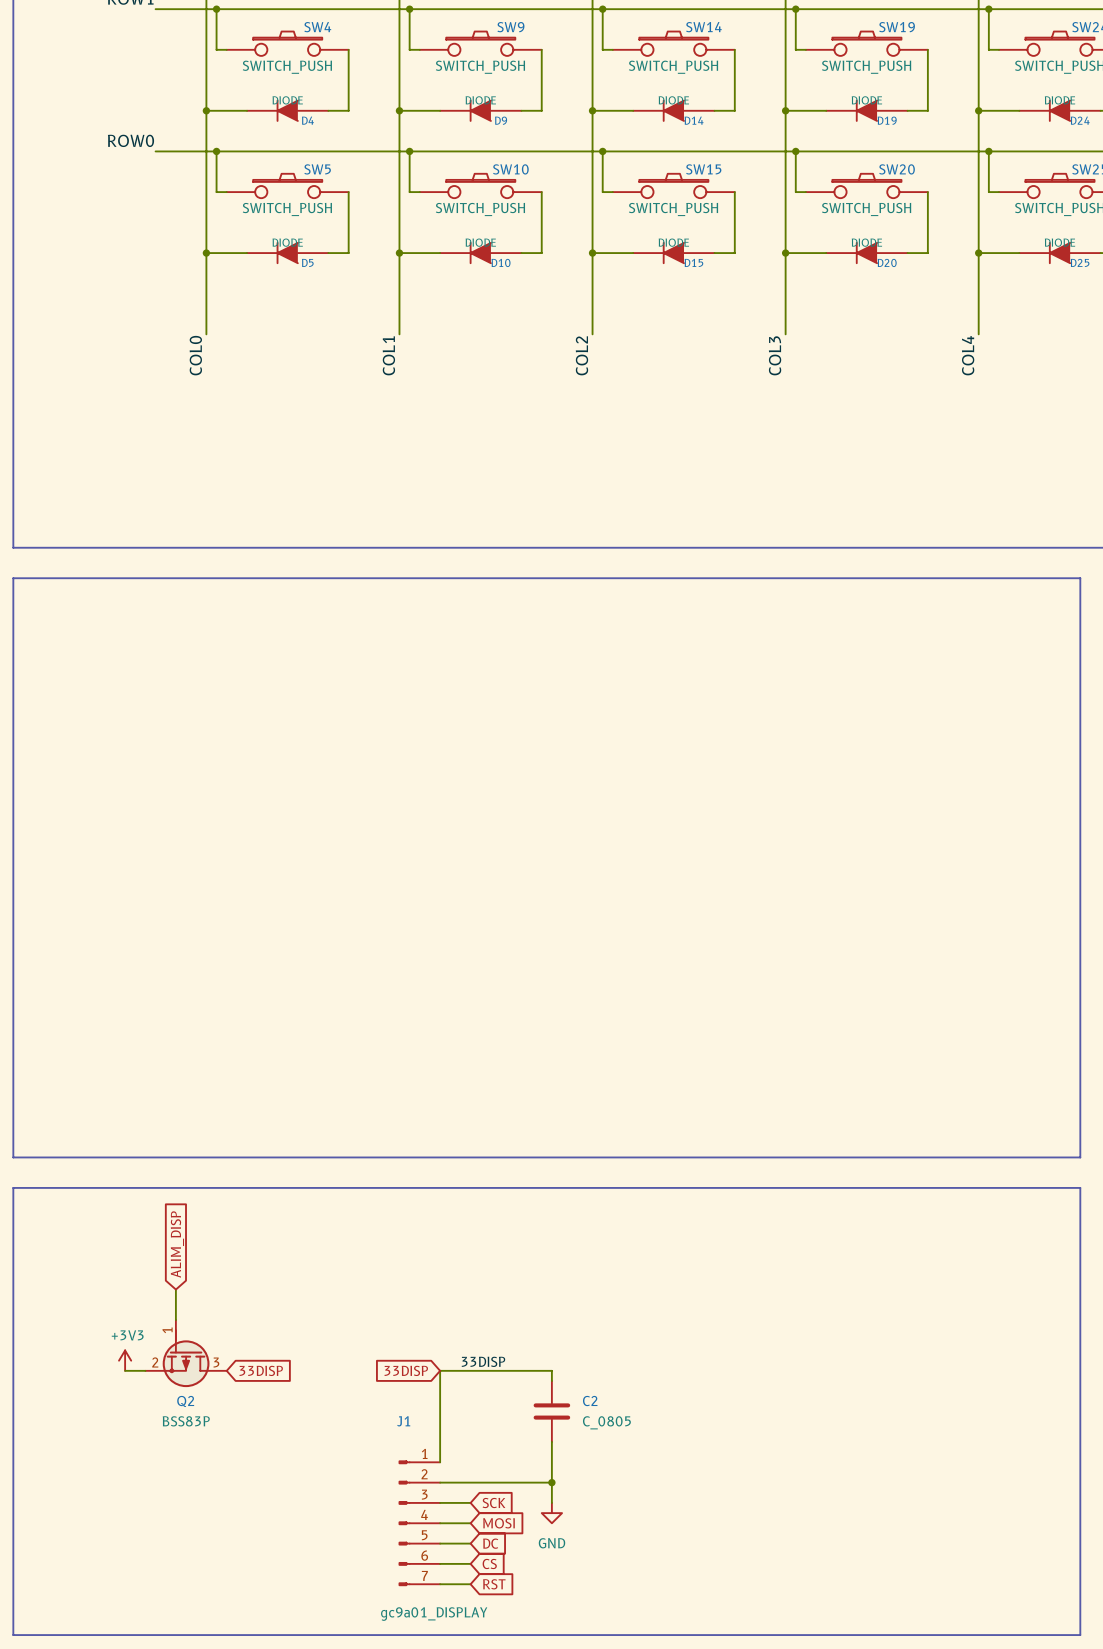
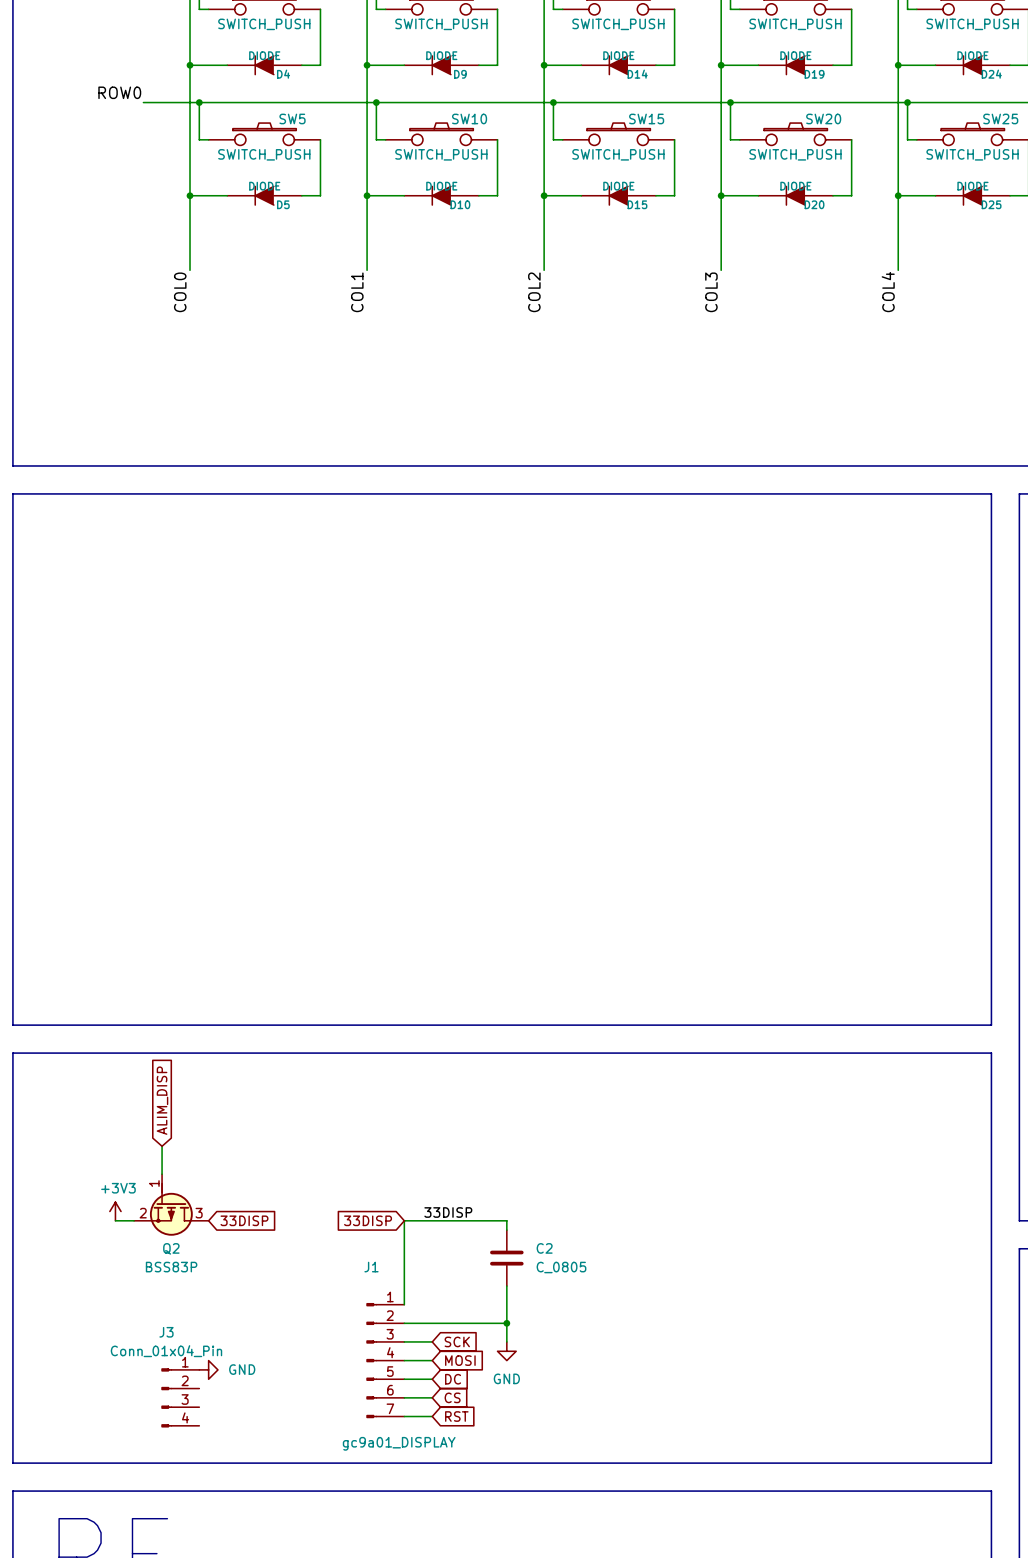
power symbol: none -> GND (208, 1369)
J3: none -> Conn_01x04_Pin (180, 1397)

